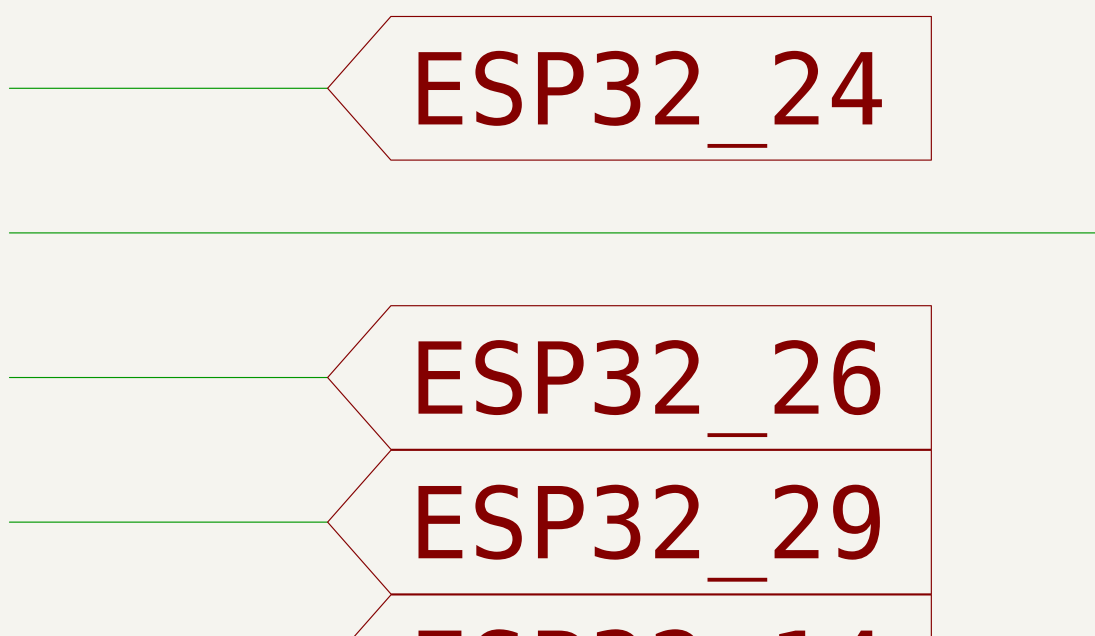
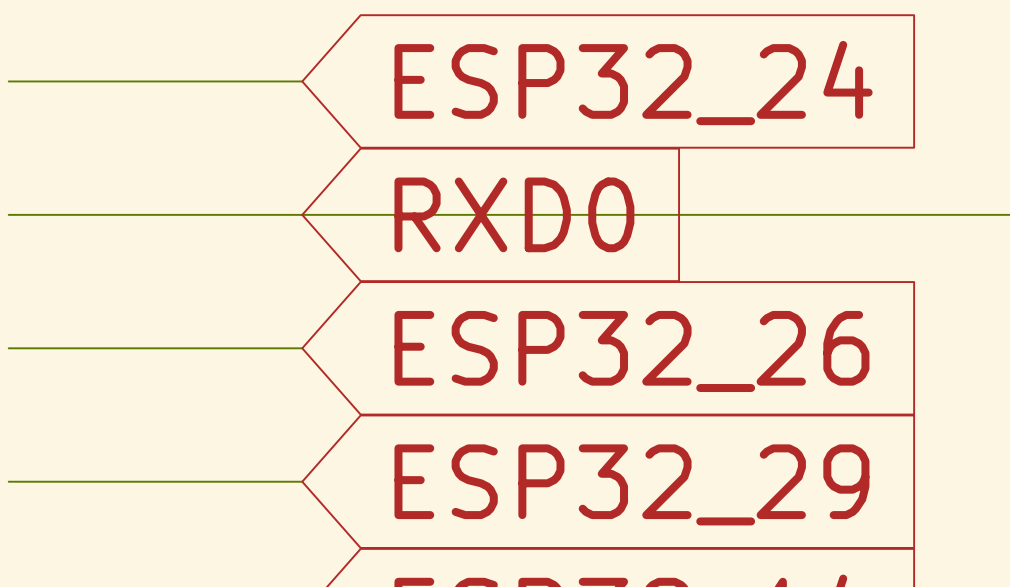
global label: none -> RXD0 (514, 214)

